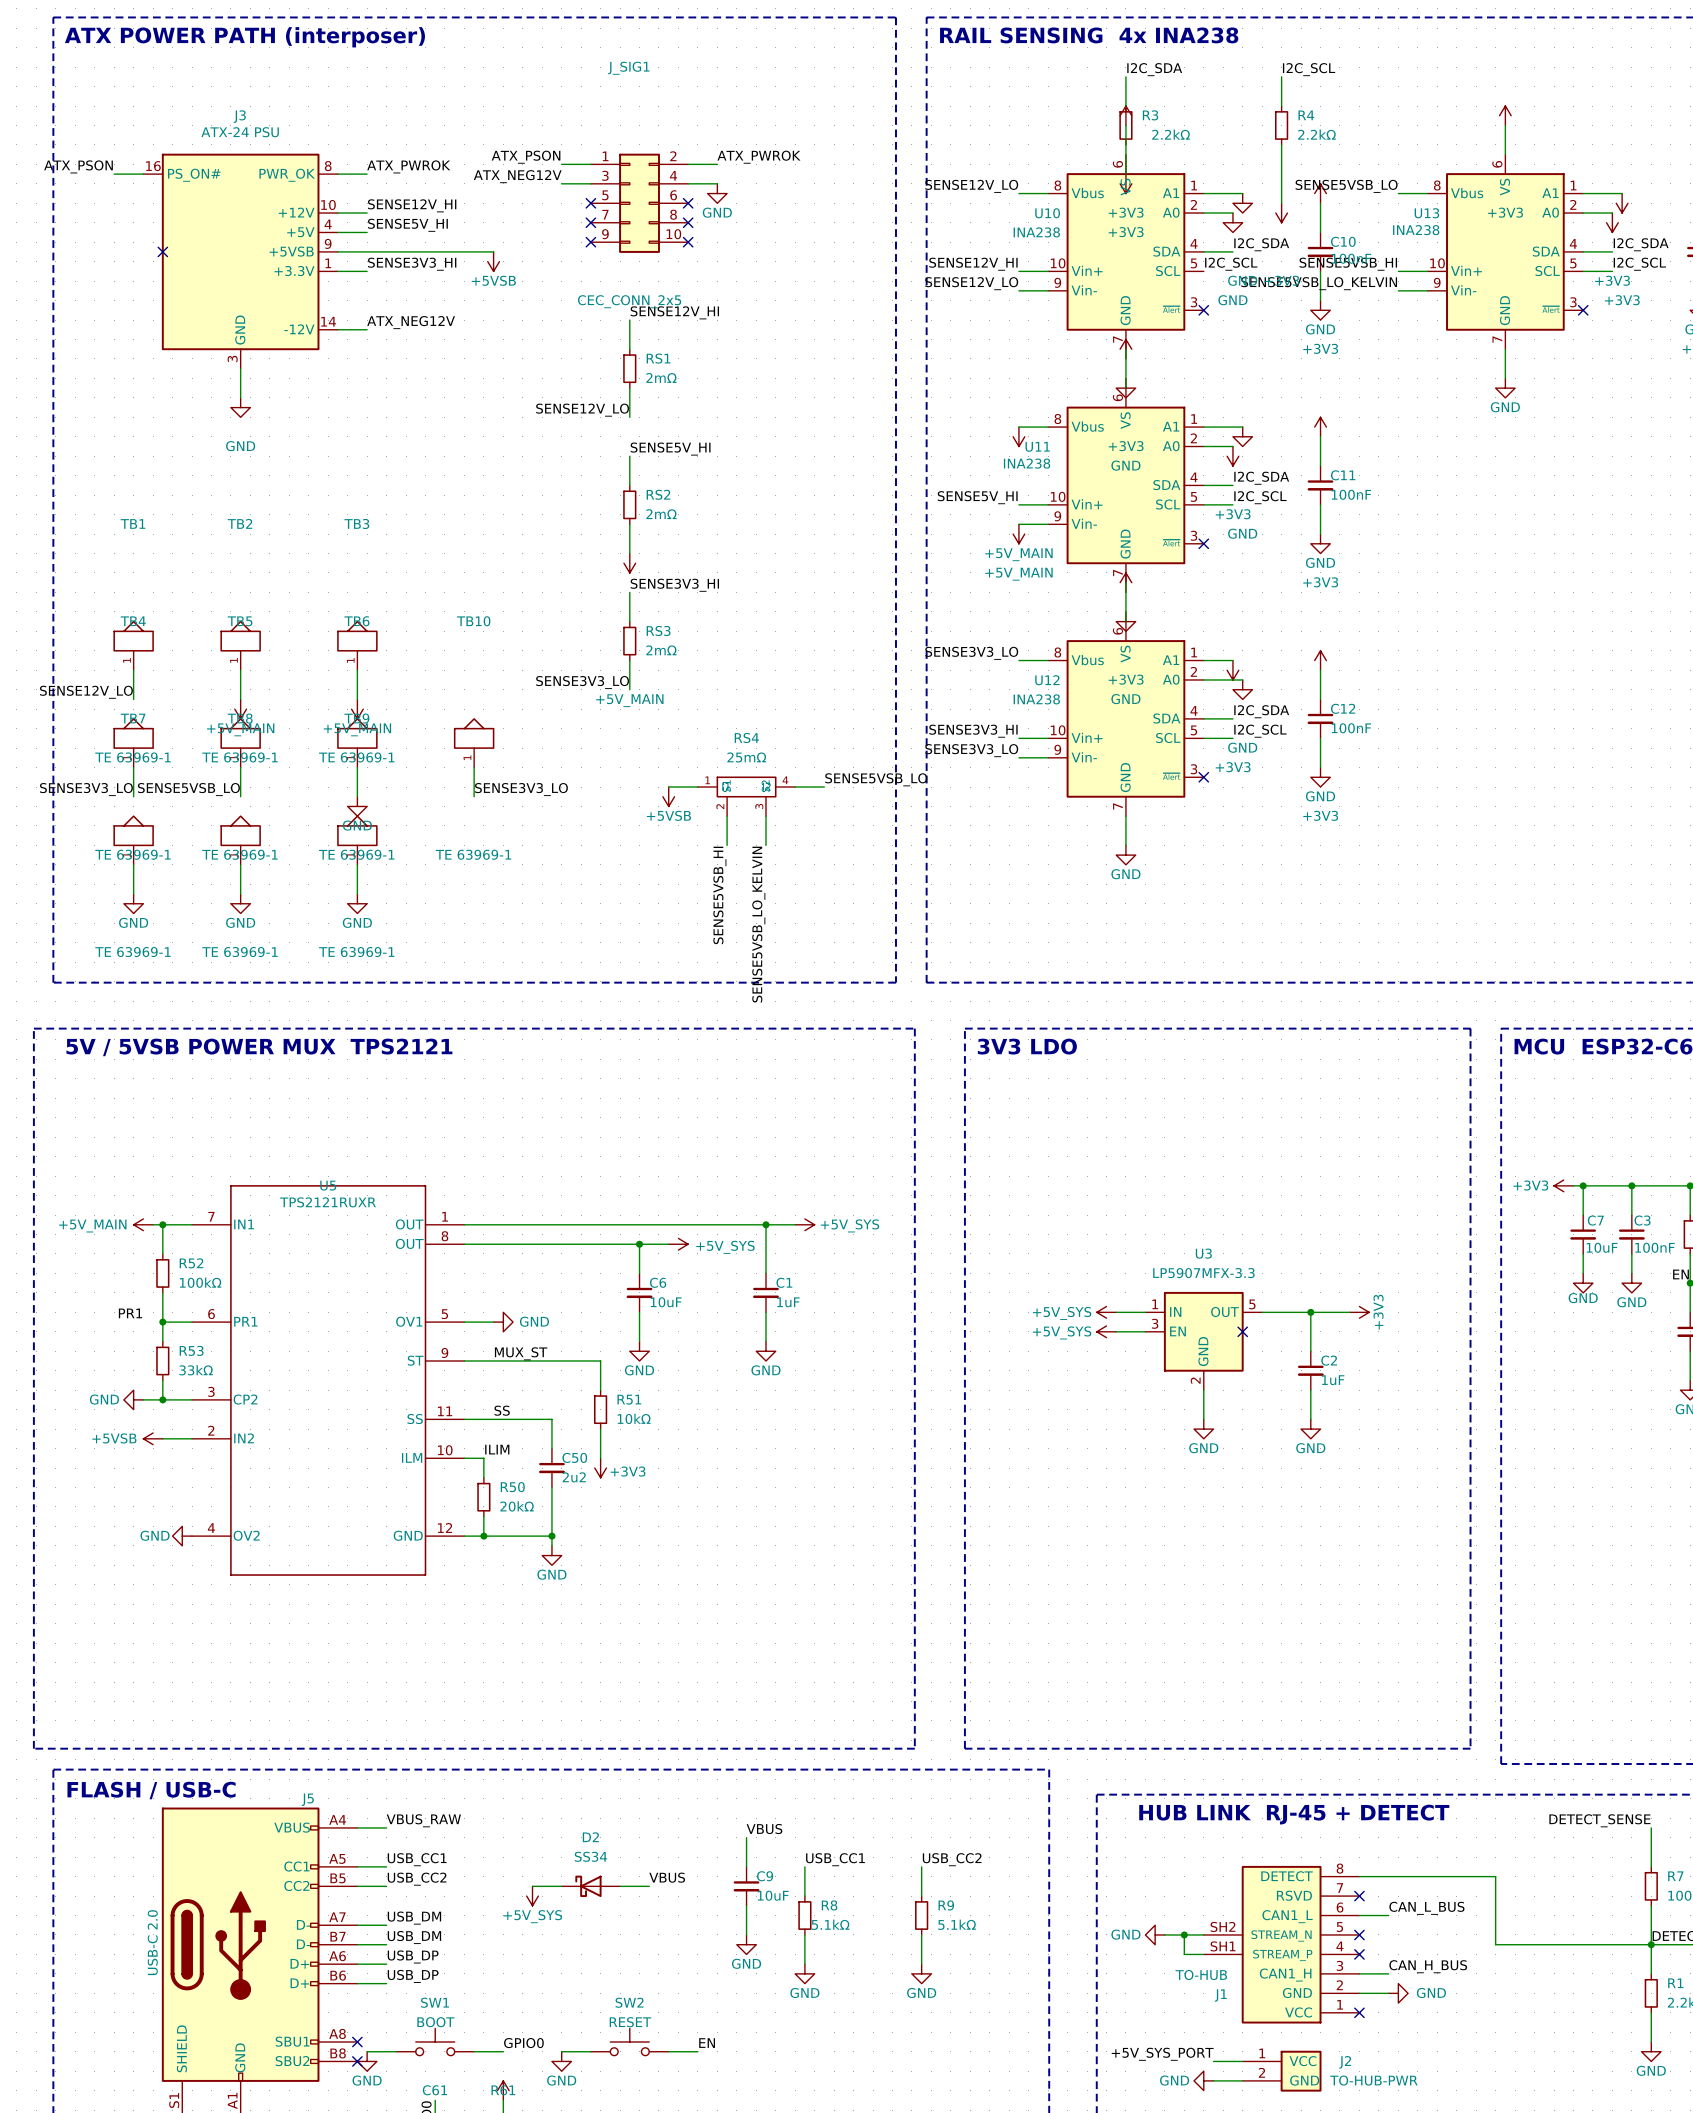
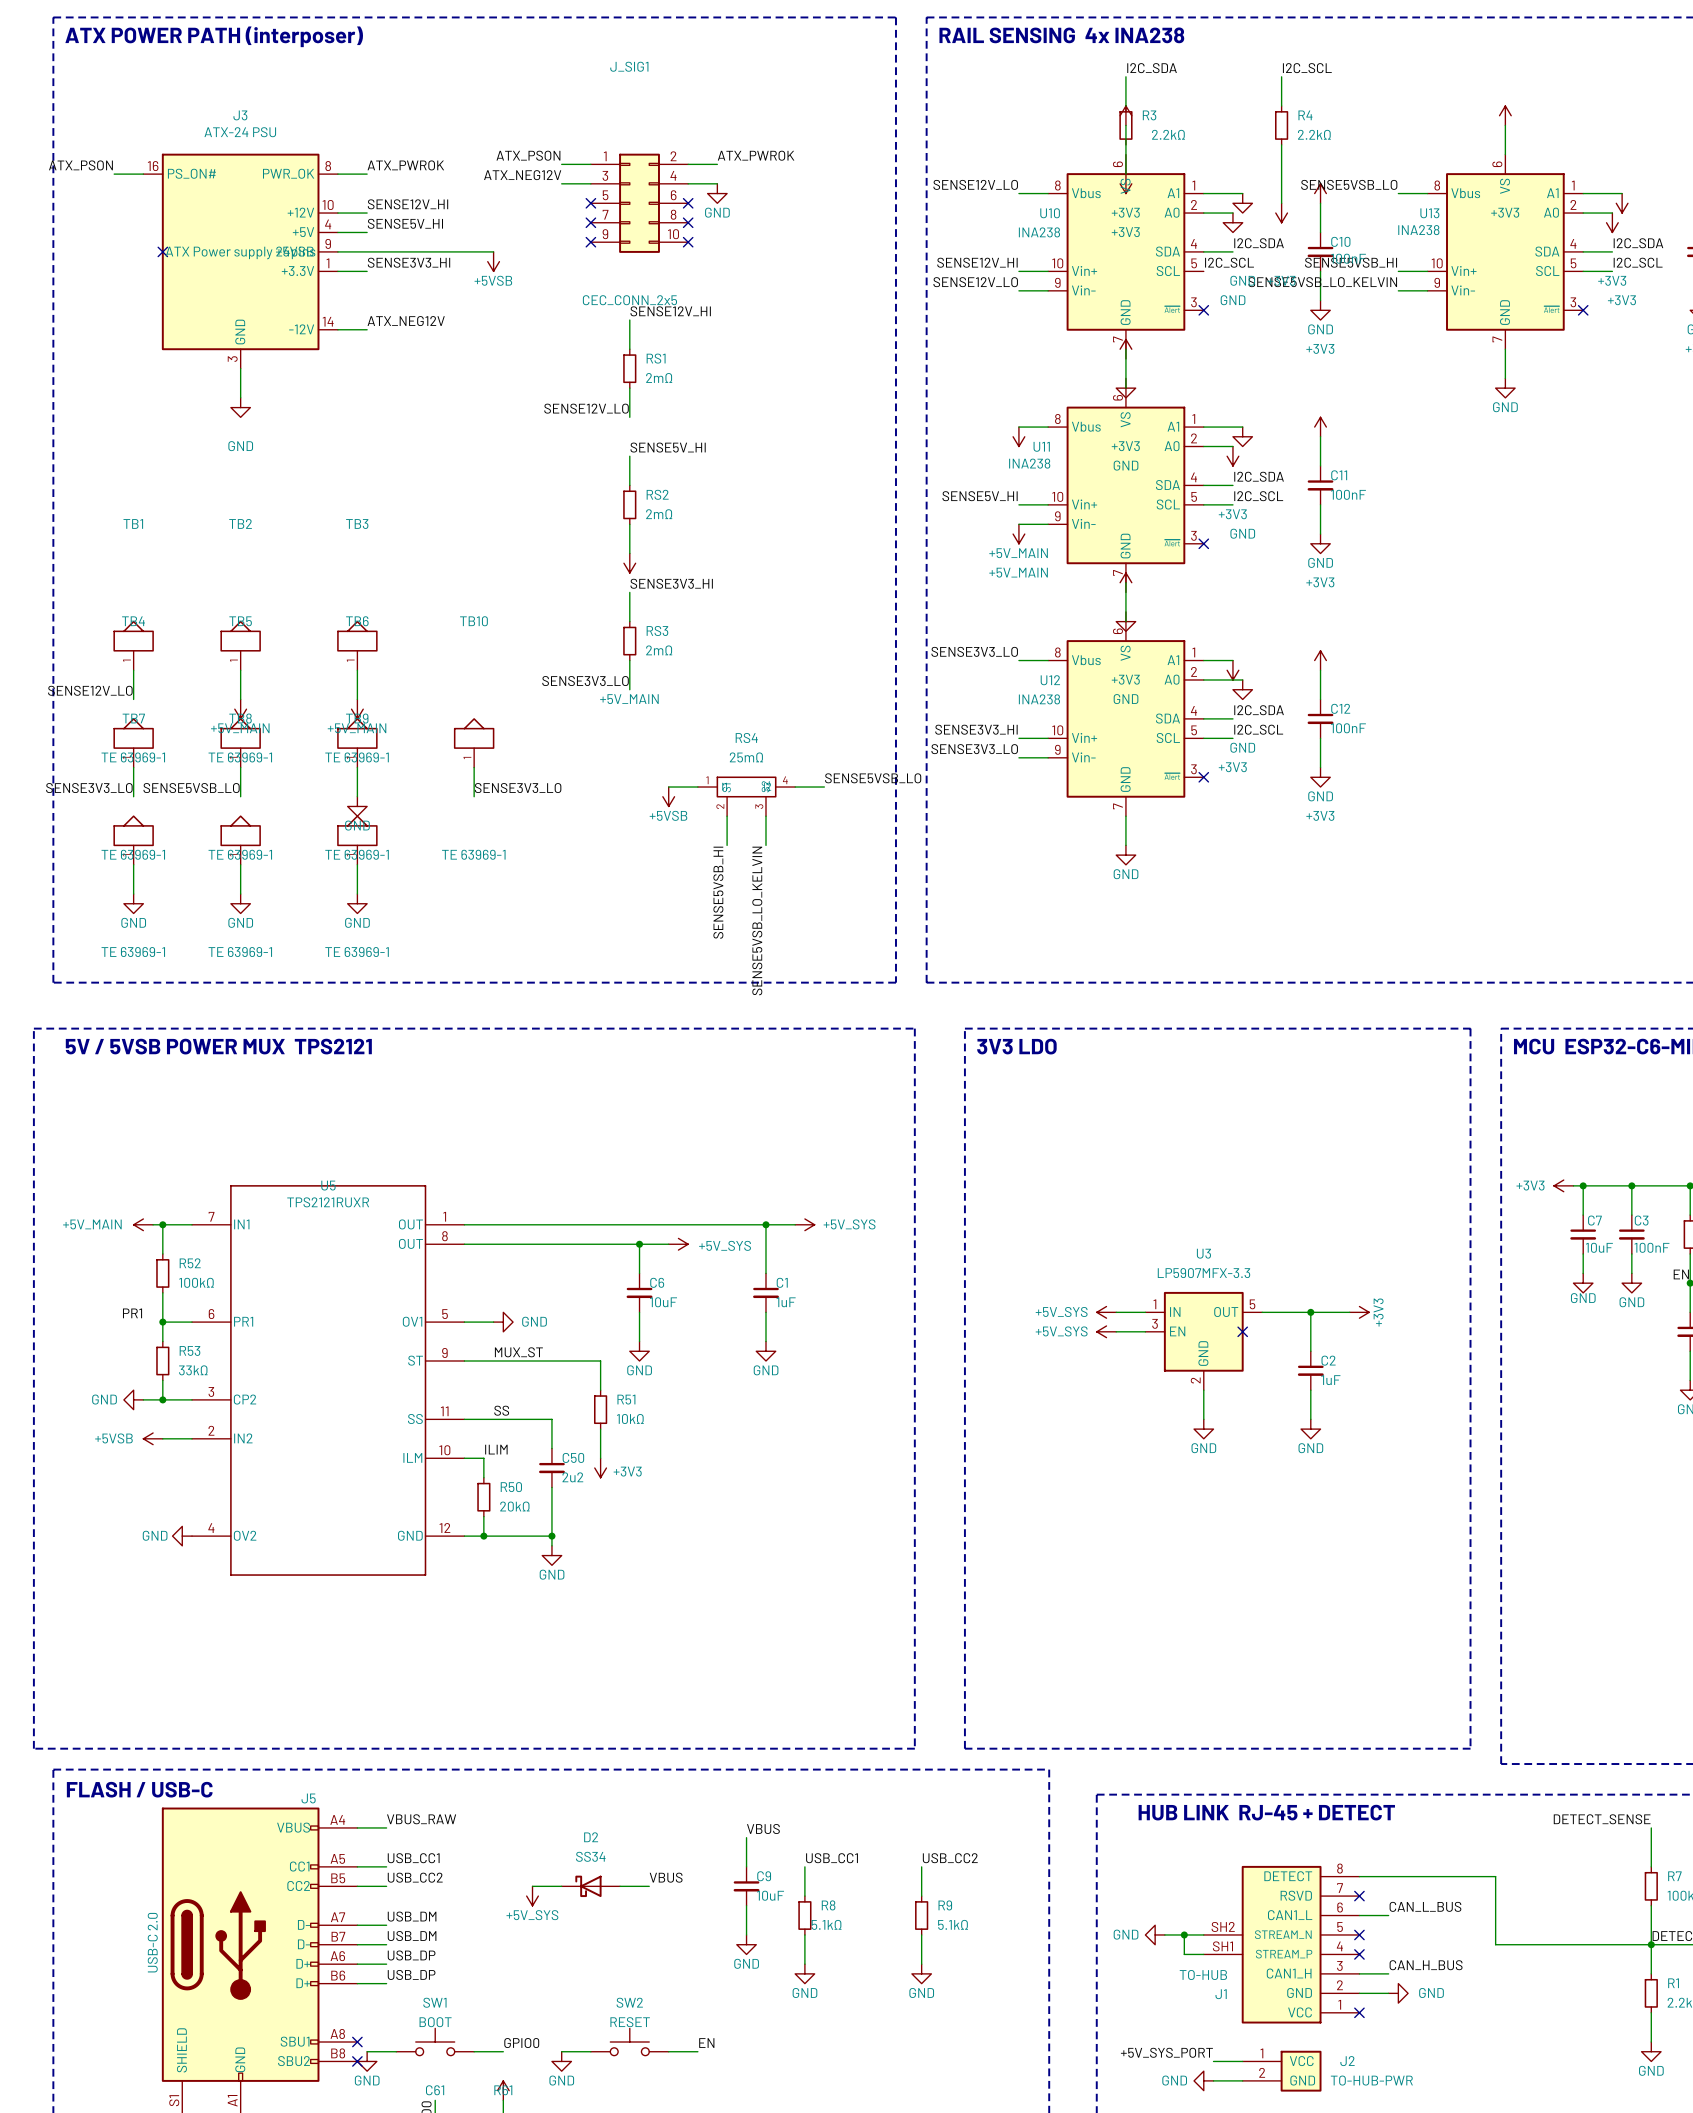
J3 text: none -> ATX Power supply 24pins (240, 252)

